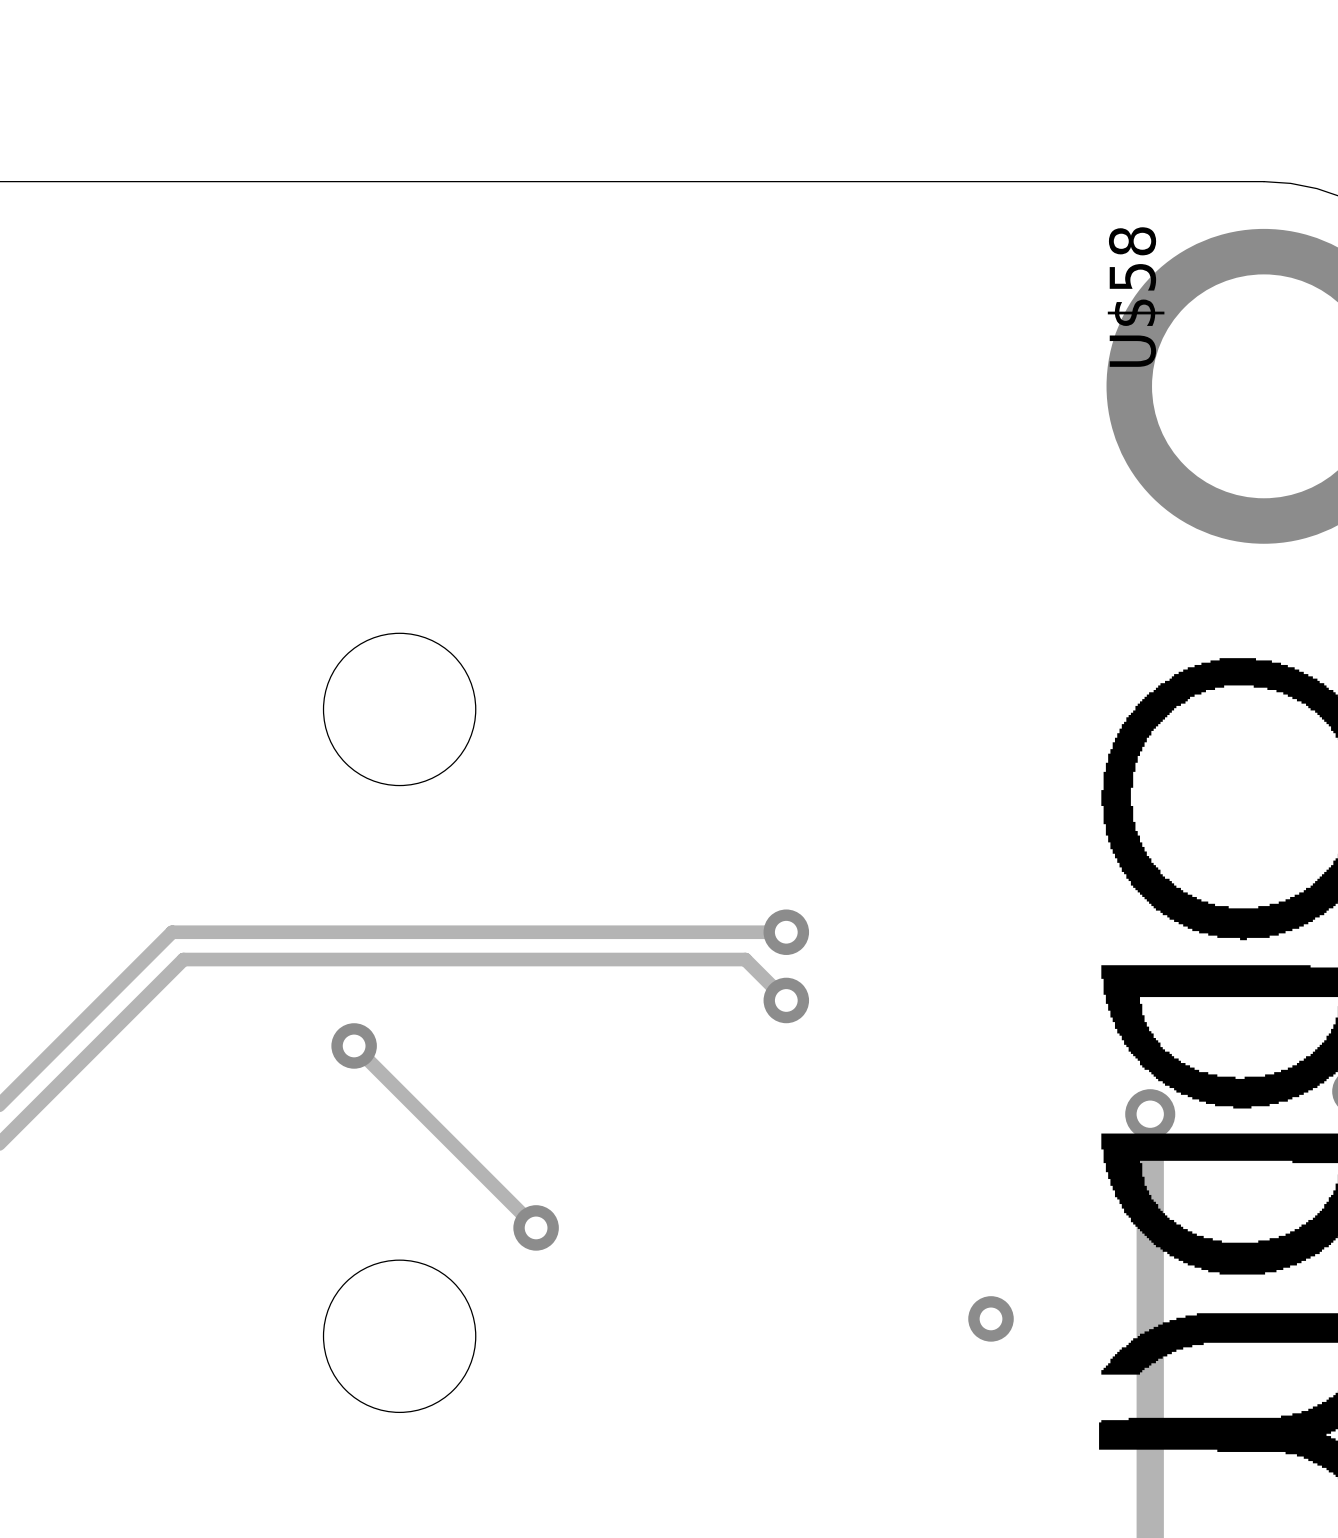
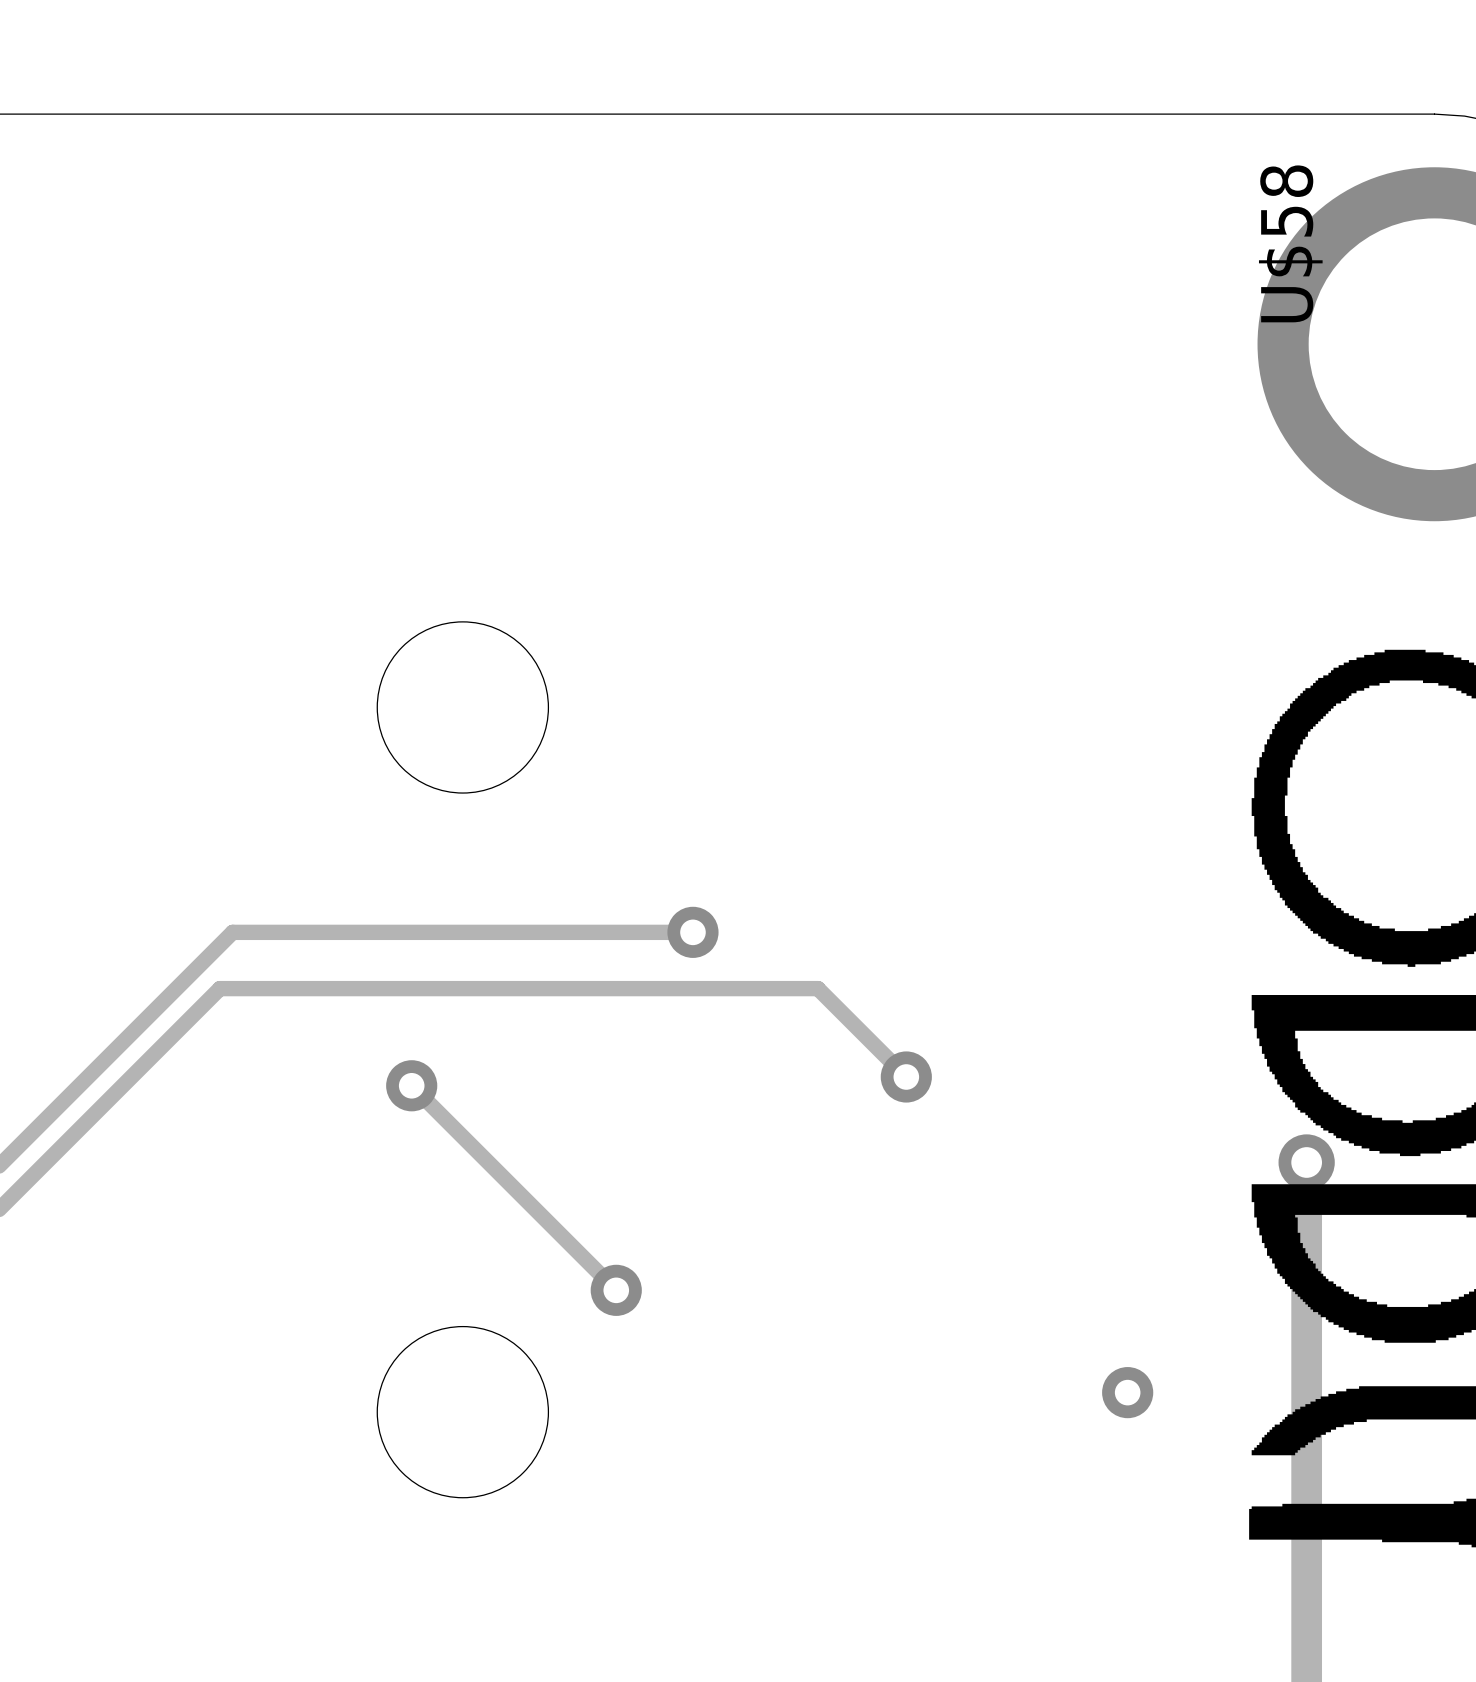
via: none -> (692, 932)
track: (172, 932) (786, 932) -> (207, 957) (232, 932) (692, 932)
via: (786, 932) -> none
track: (715, 959) (745, 959) (786, 1000) -> (817, 988) (906, 1076)
via position: (786, 1000) -> (906, 1076)

